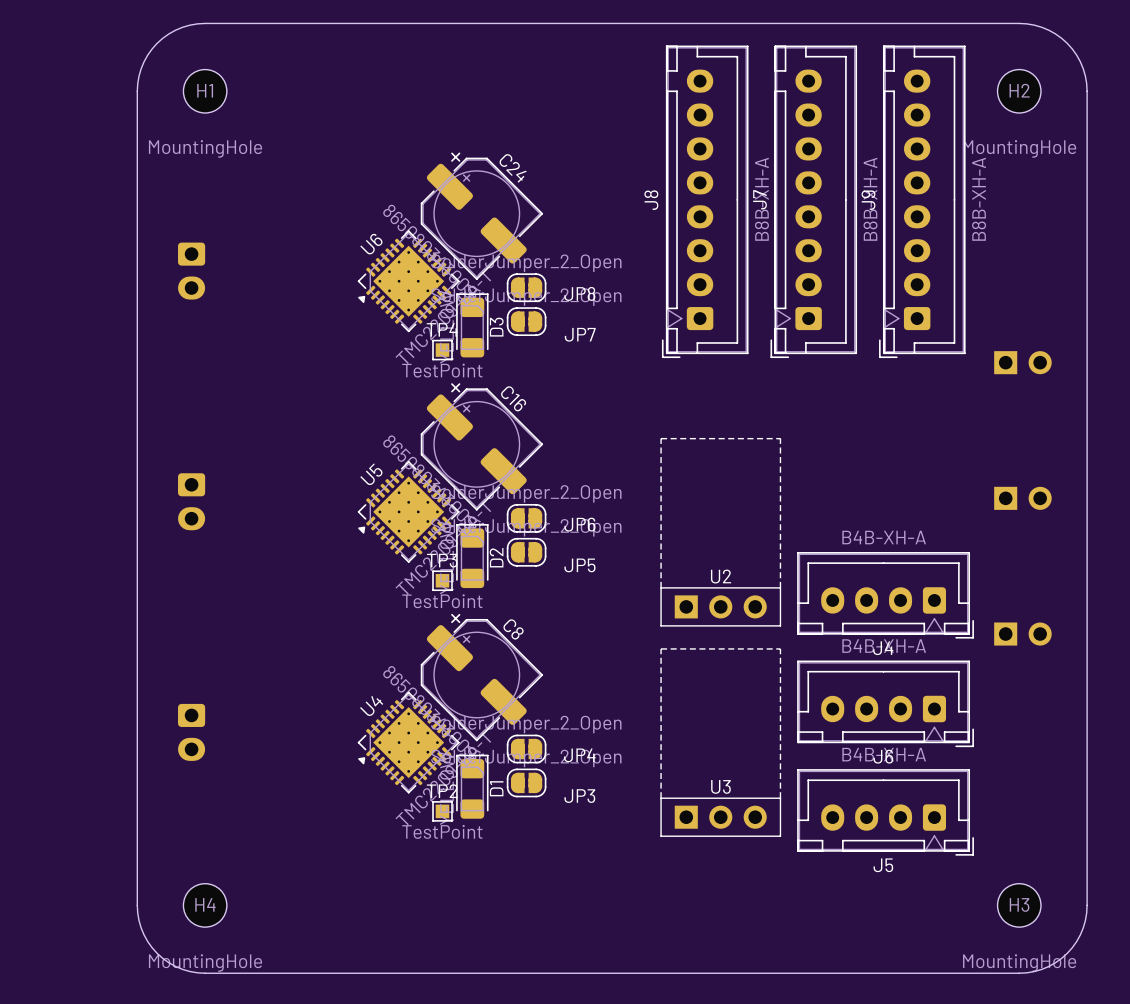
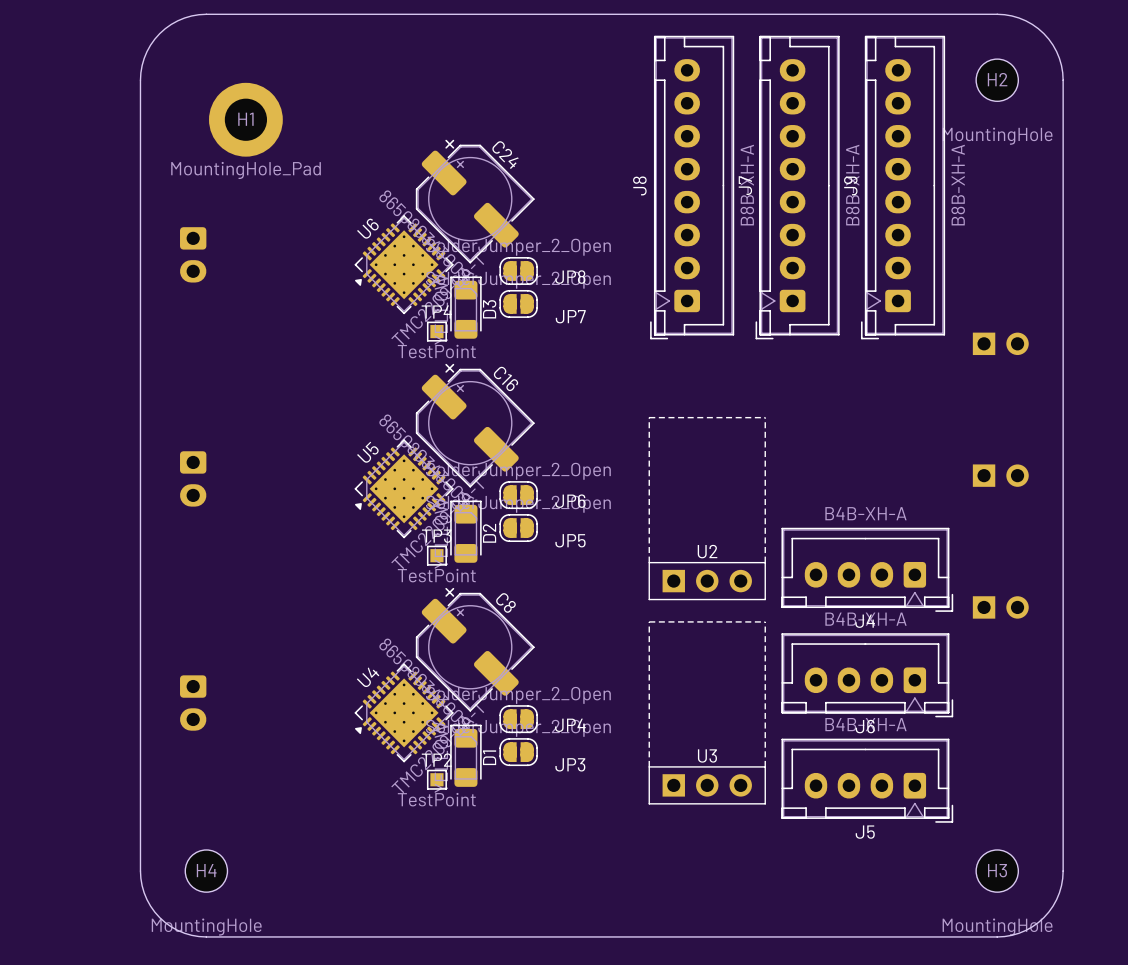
H1 footprint: [183, 69, 227, 114] -> [209, 82, 283, 157]
H1 value: MountingHole (205, 148) -> MountingHole_Pad (246, 170)

